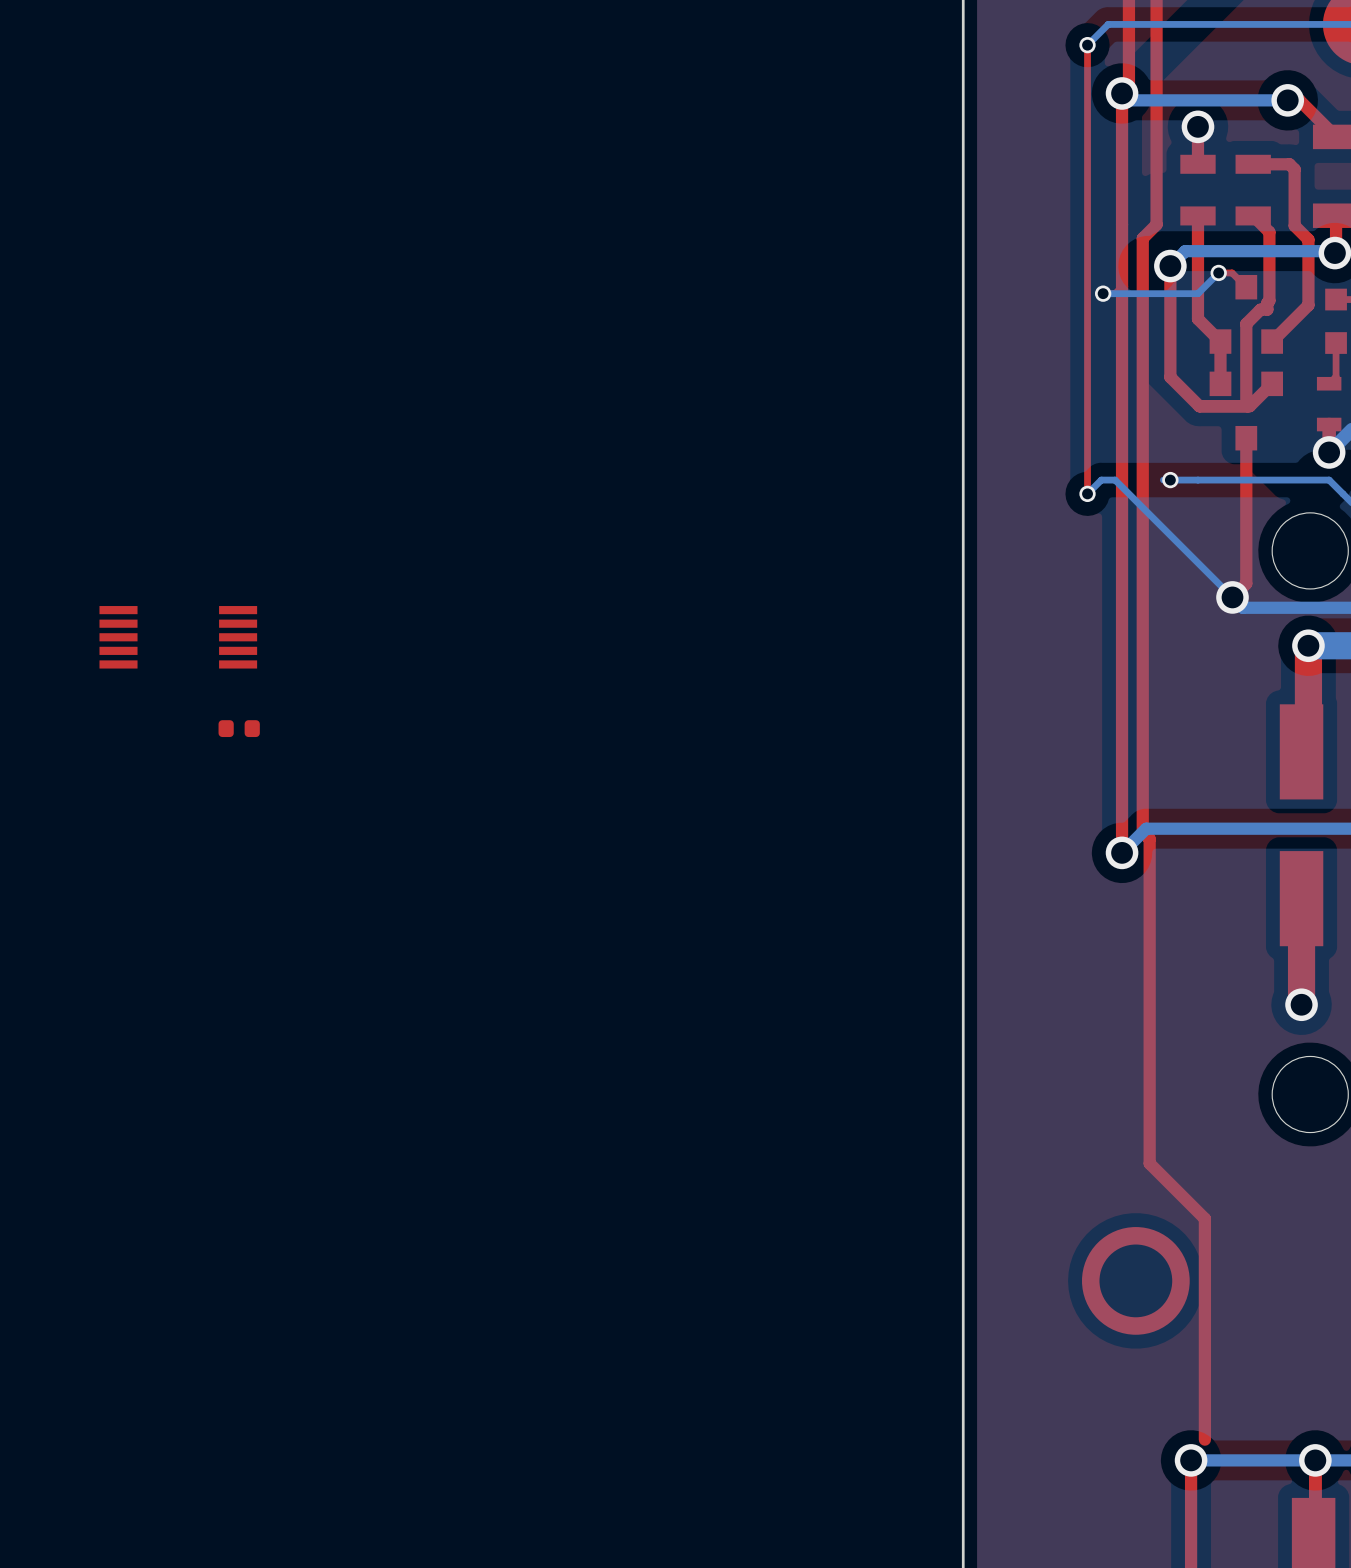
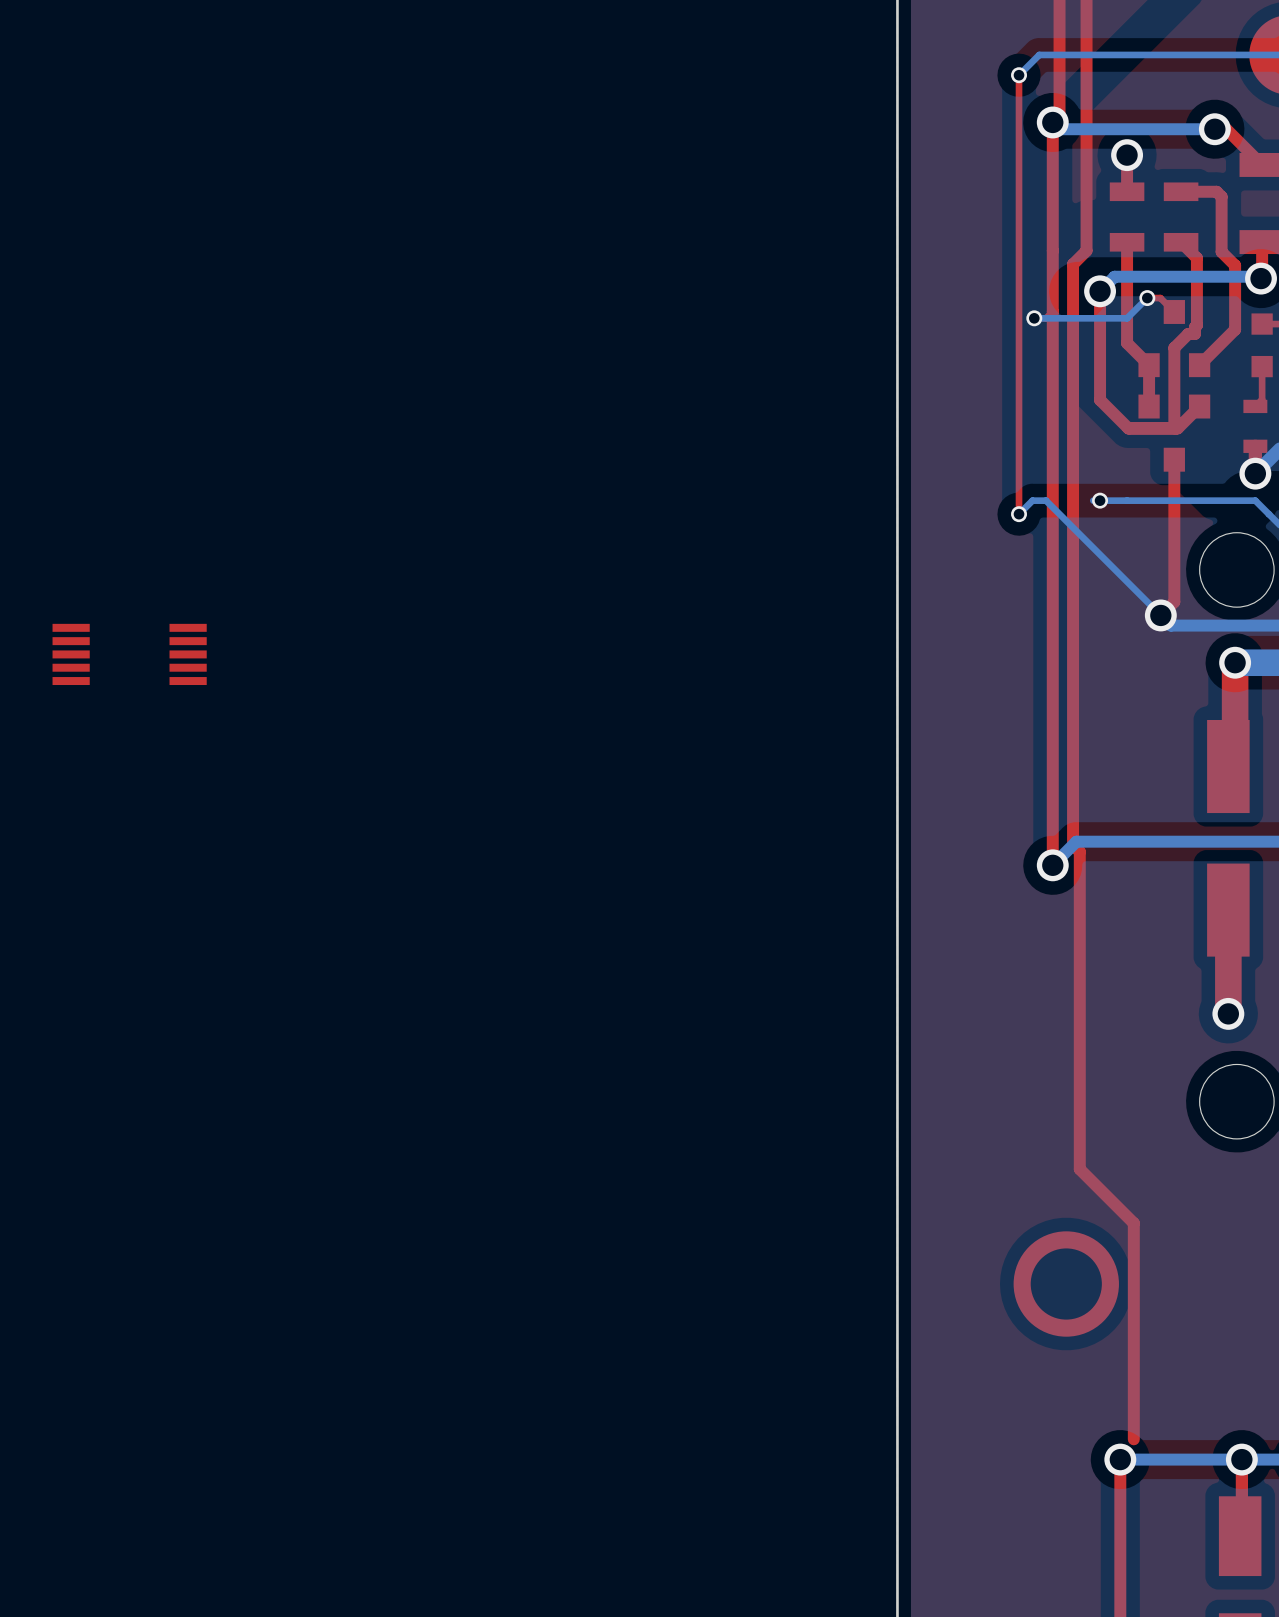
part: (239, 728) -> none

